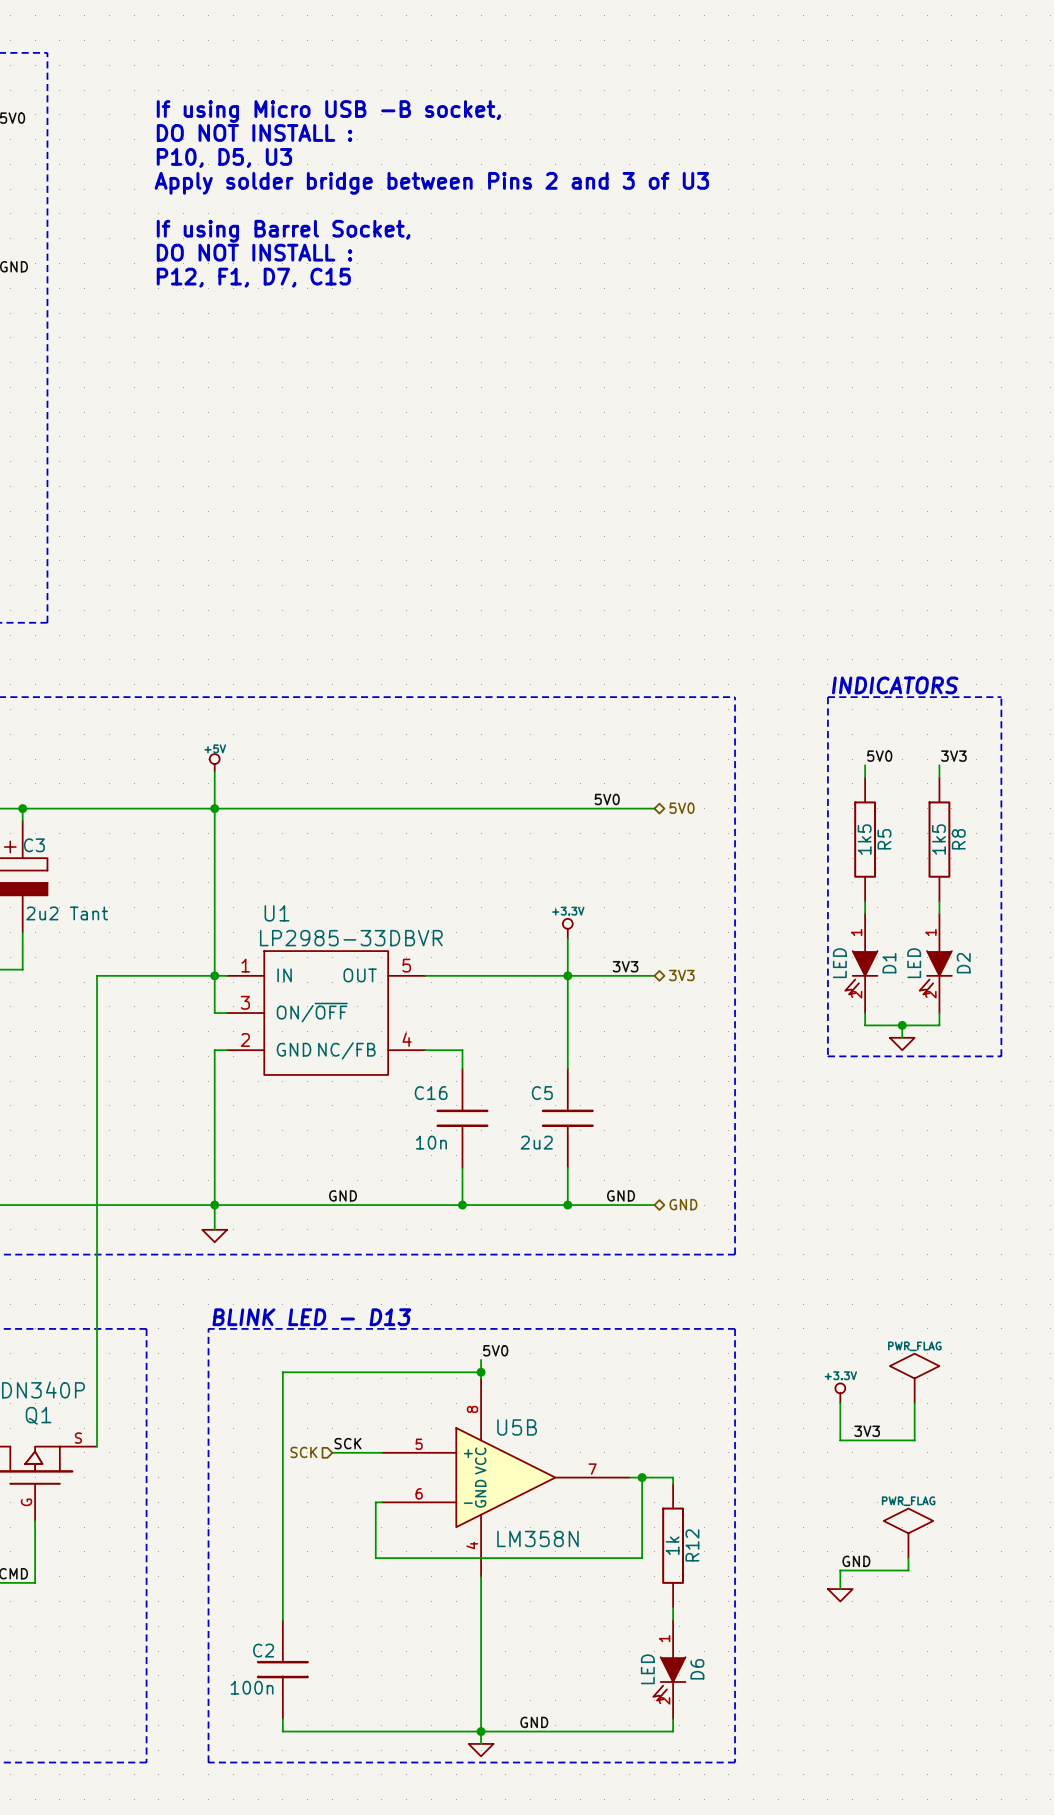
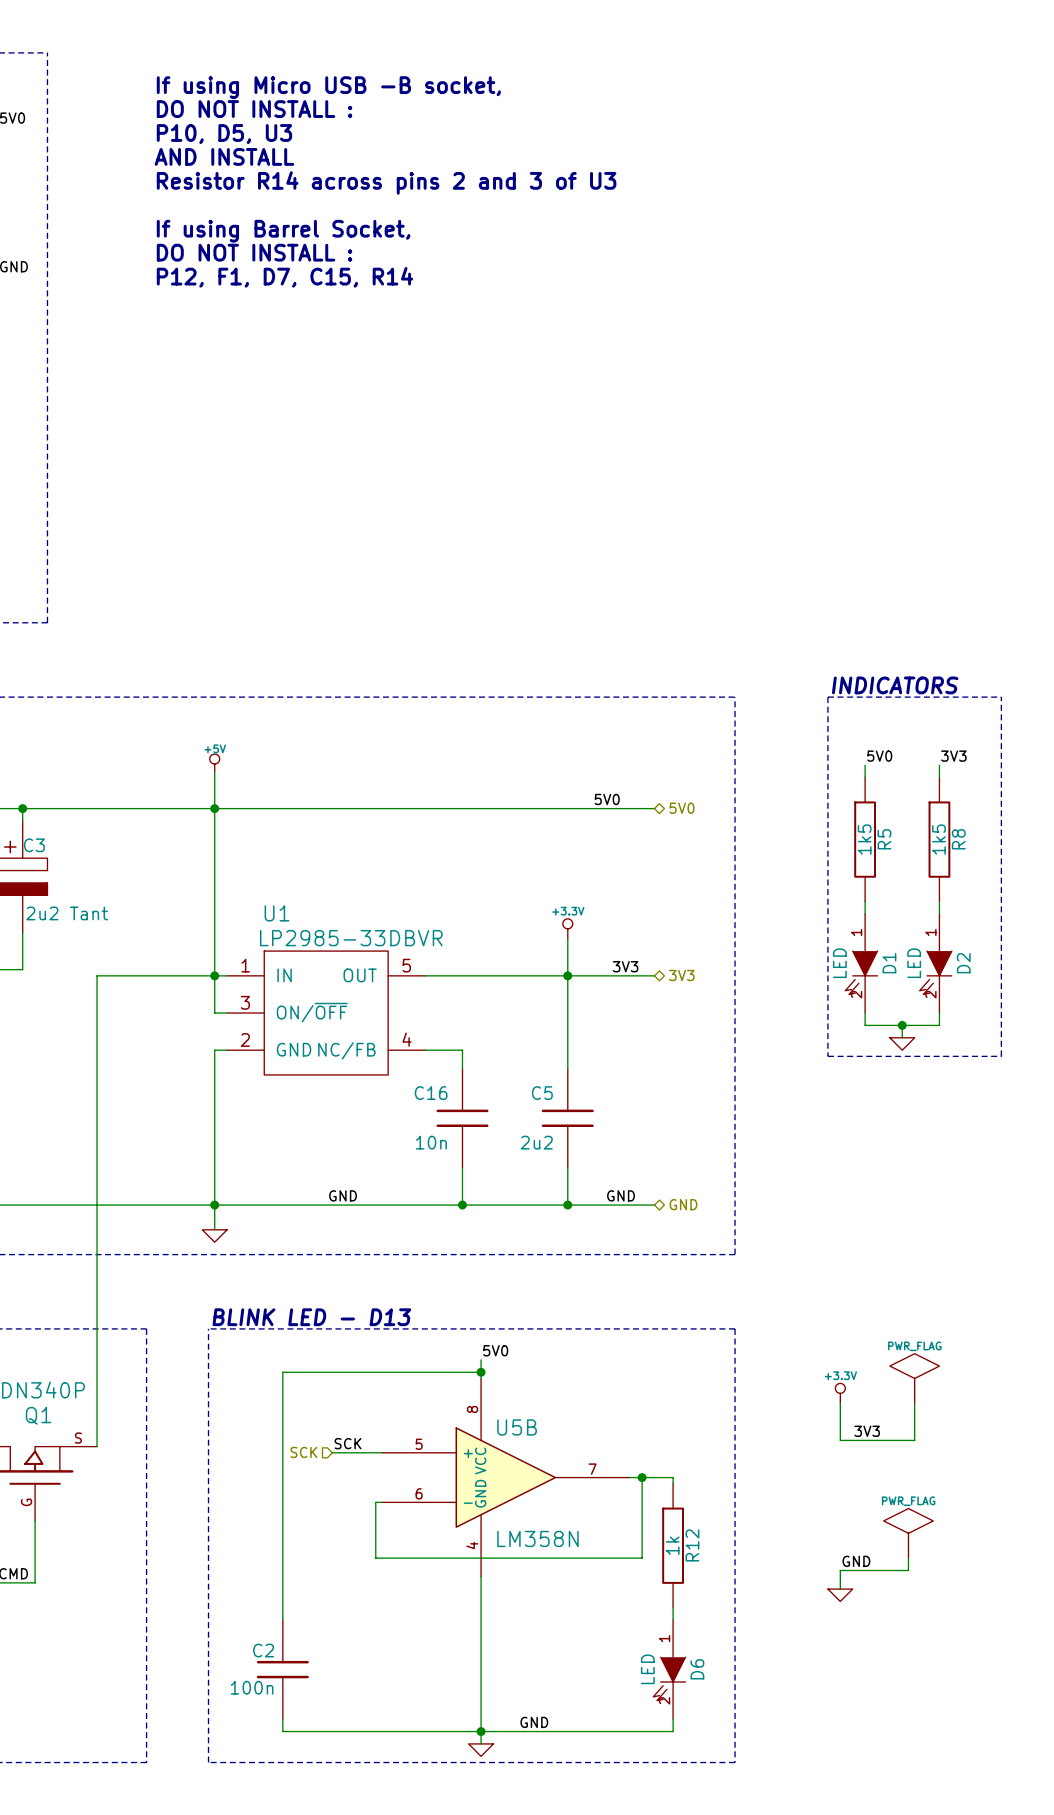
text: none -> If using Micro USB -B socket, (328, 87)
text: If using Micro USB -B socket, (328, 111) -> DO NOT INSTALL : (254, 109)
text: DO NOT INSTALL : (254, 132) -> P10, D5, U3 (224, 134)
text: P10, D5, U3 (224, 157) -> AND INSTALL (224, 156)
text: Apply solder bridge between Pins 2 and 3 of U3 (431, 183) -> Resistor R14 across pins 2 and 3 of U3 (386, 182)
text: P12, F1, D7, C15 (253, 277) -> P12, F1, D7, C15, R14 (284, 277)

